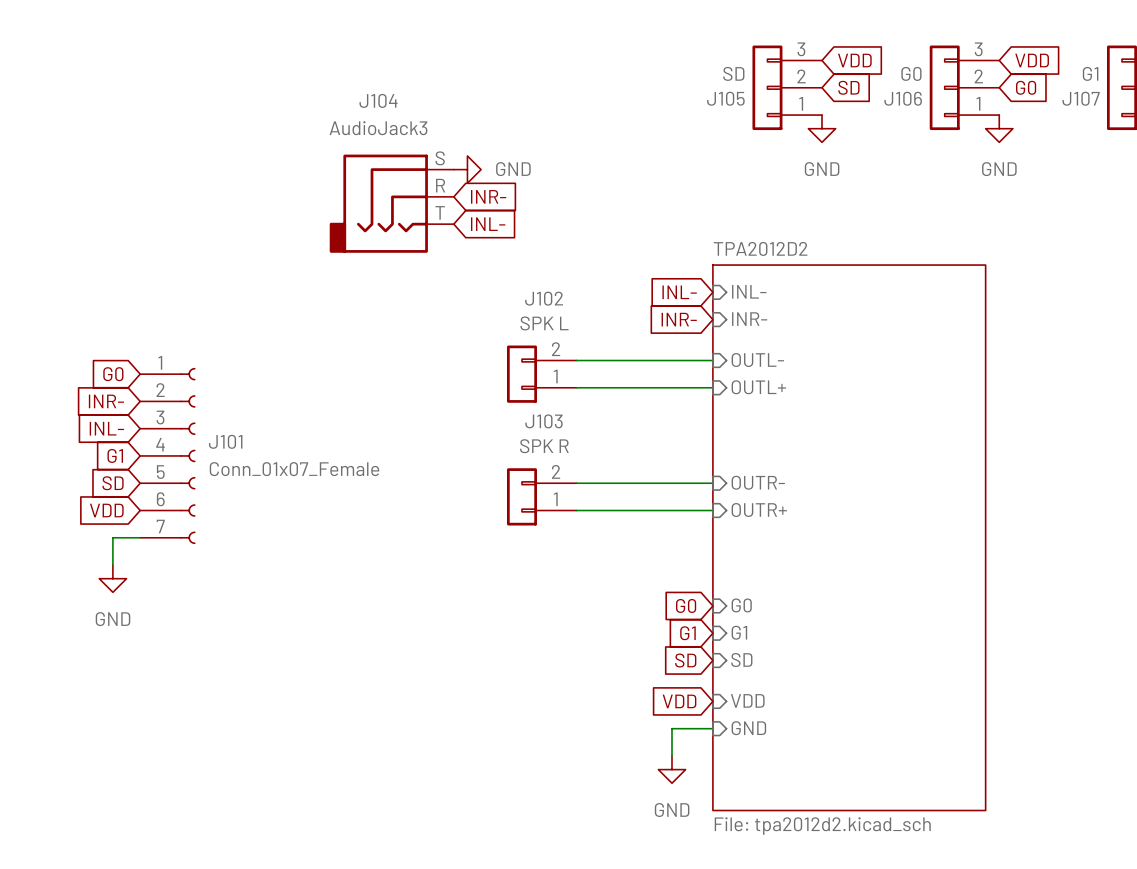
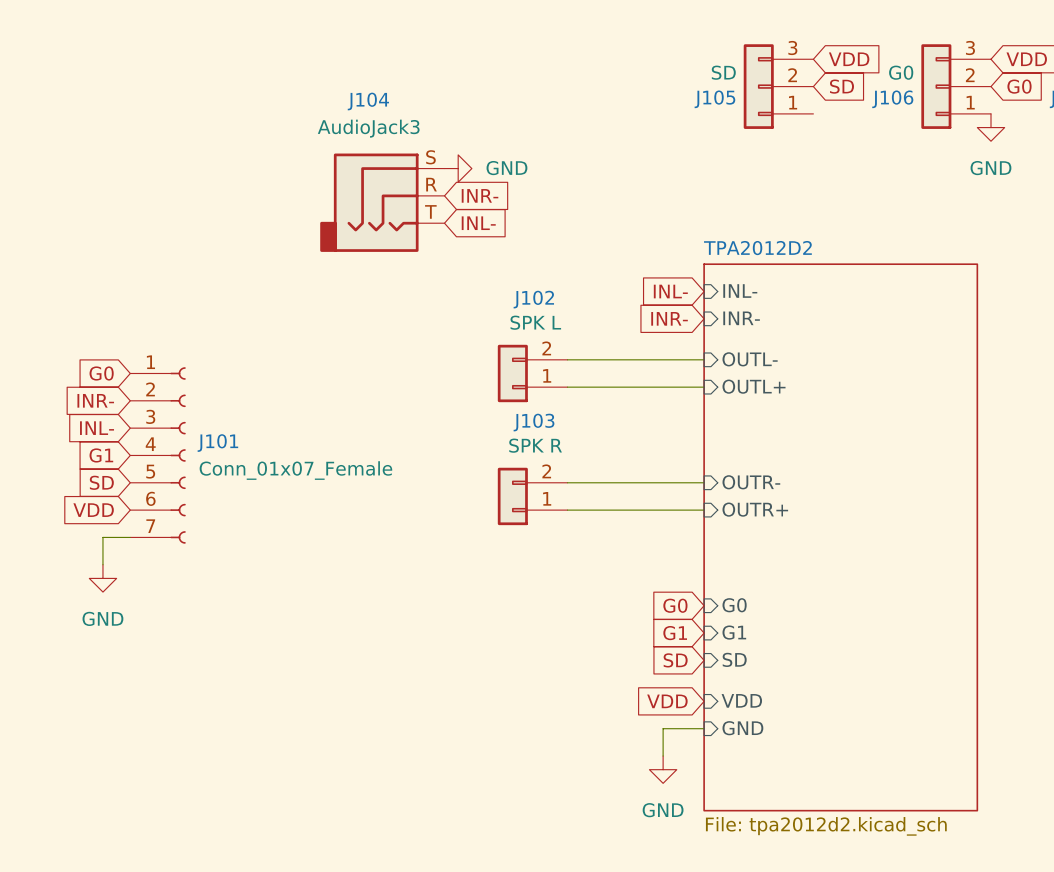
power symbol: GND (821, 128) -> none

